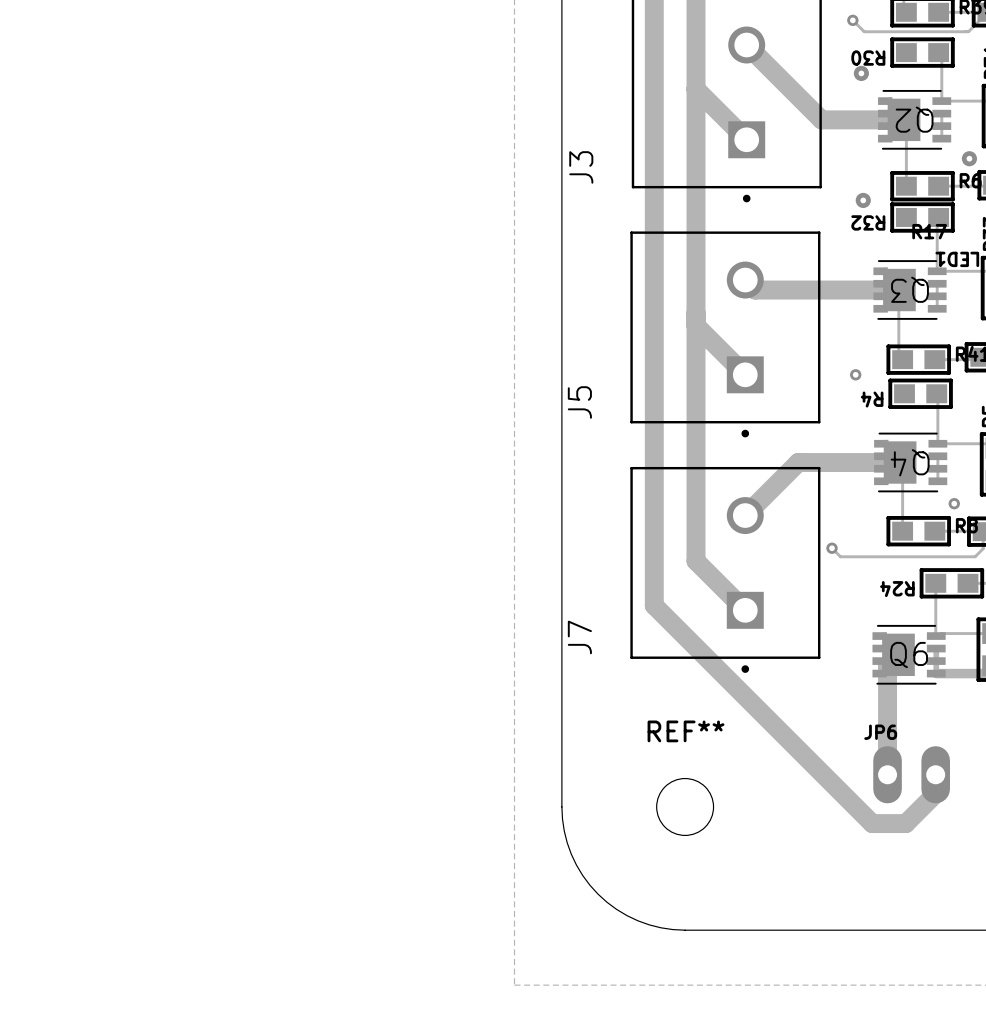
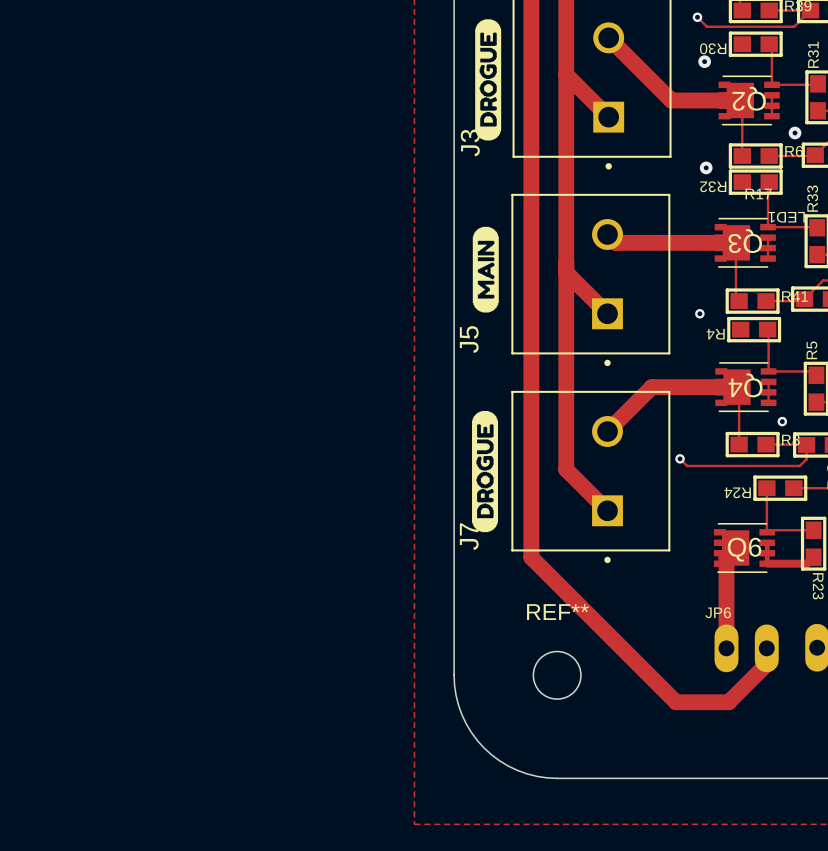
drawing: none -> [475, 19, 502, 141]
drawing: none -> [472, 226, 499, 313]
drawing: none -> [472, 410, 499, 533]
track: (654, 605) (872, 823) (905, 823) -> (531, 506) (531, 557) (676, 702) (728, 702) (741, 689)

